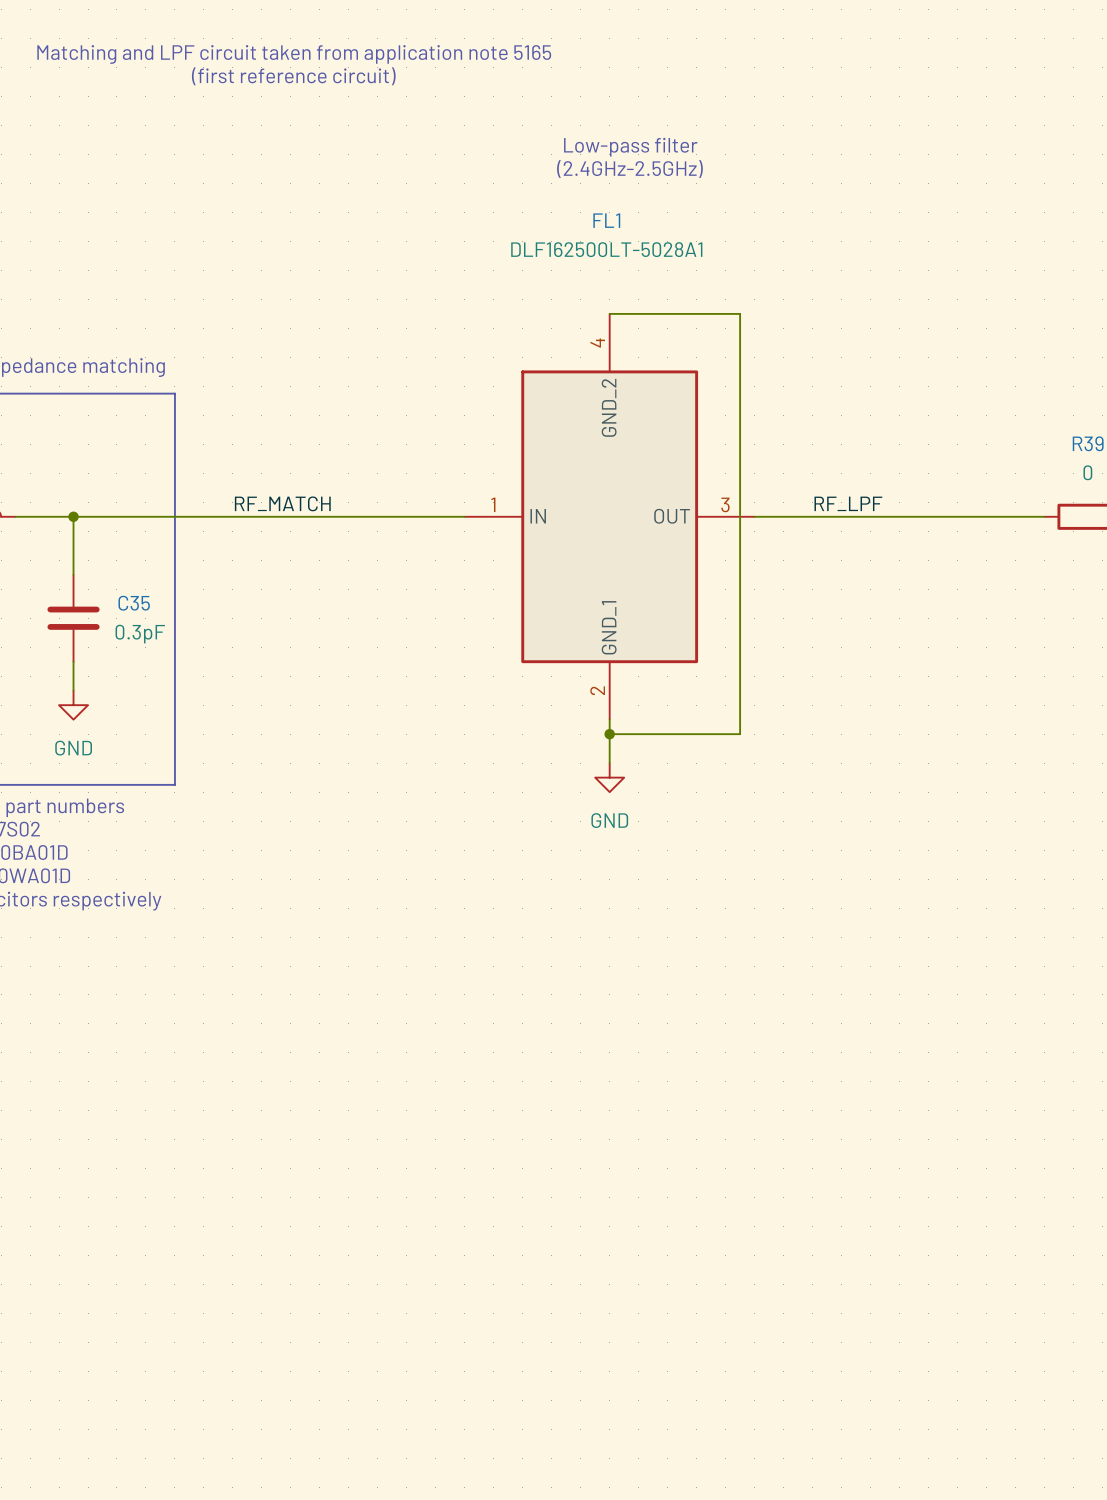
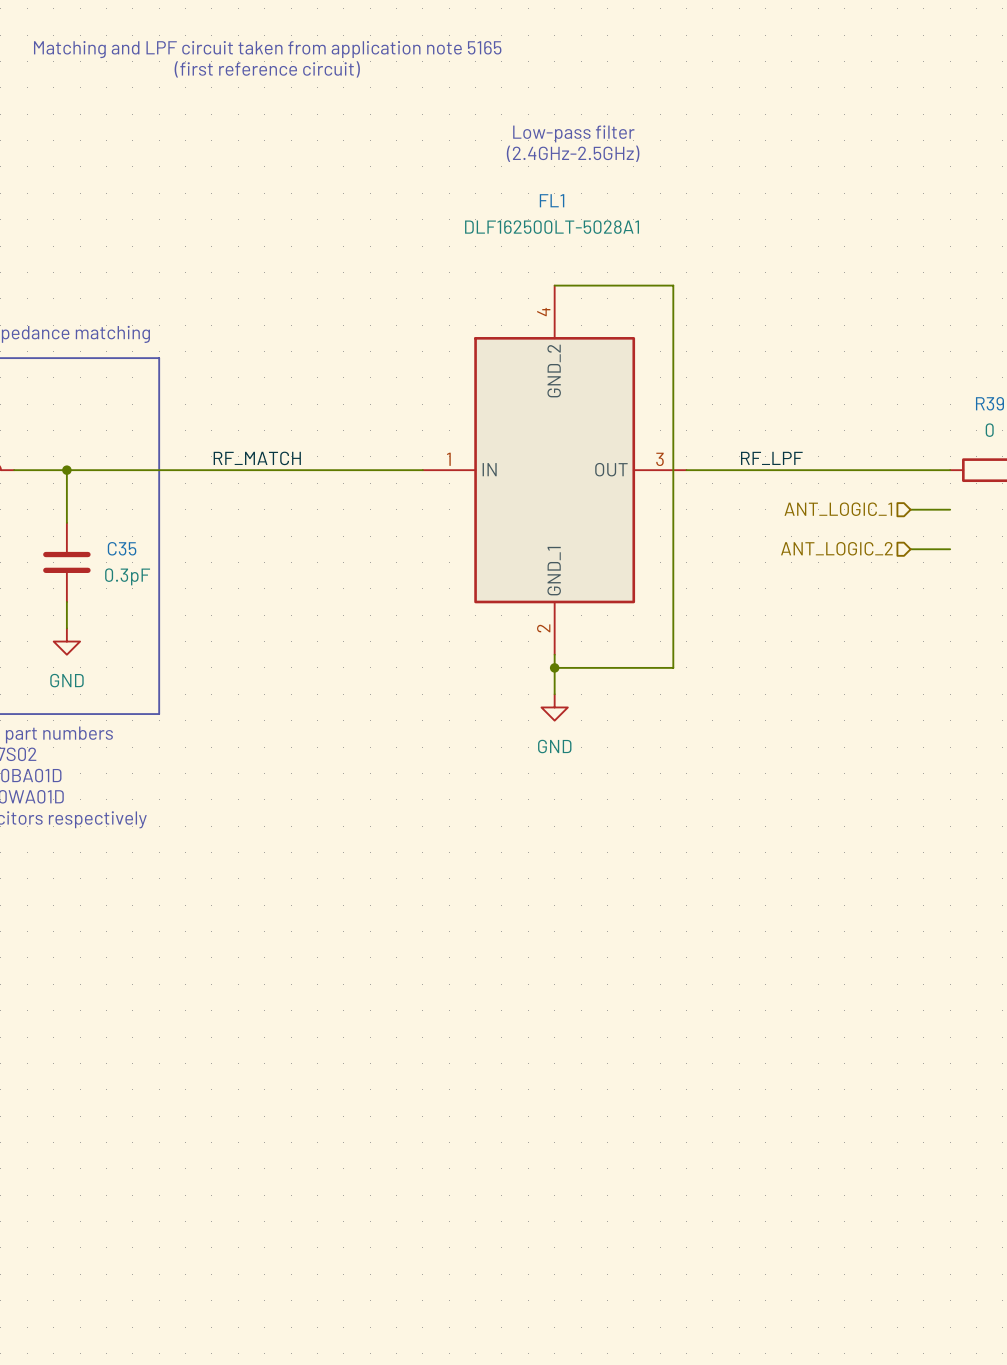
hierarchical label: none -> ANT_LOGIC_1 (838, 509)
wire: none -> (910, 509) (950, 509)
hierarchical label: none -> ANT_LOGIC_2 (836, 548)
wire: none -> (910, 549) (950, 549)

